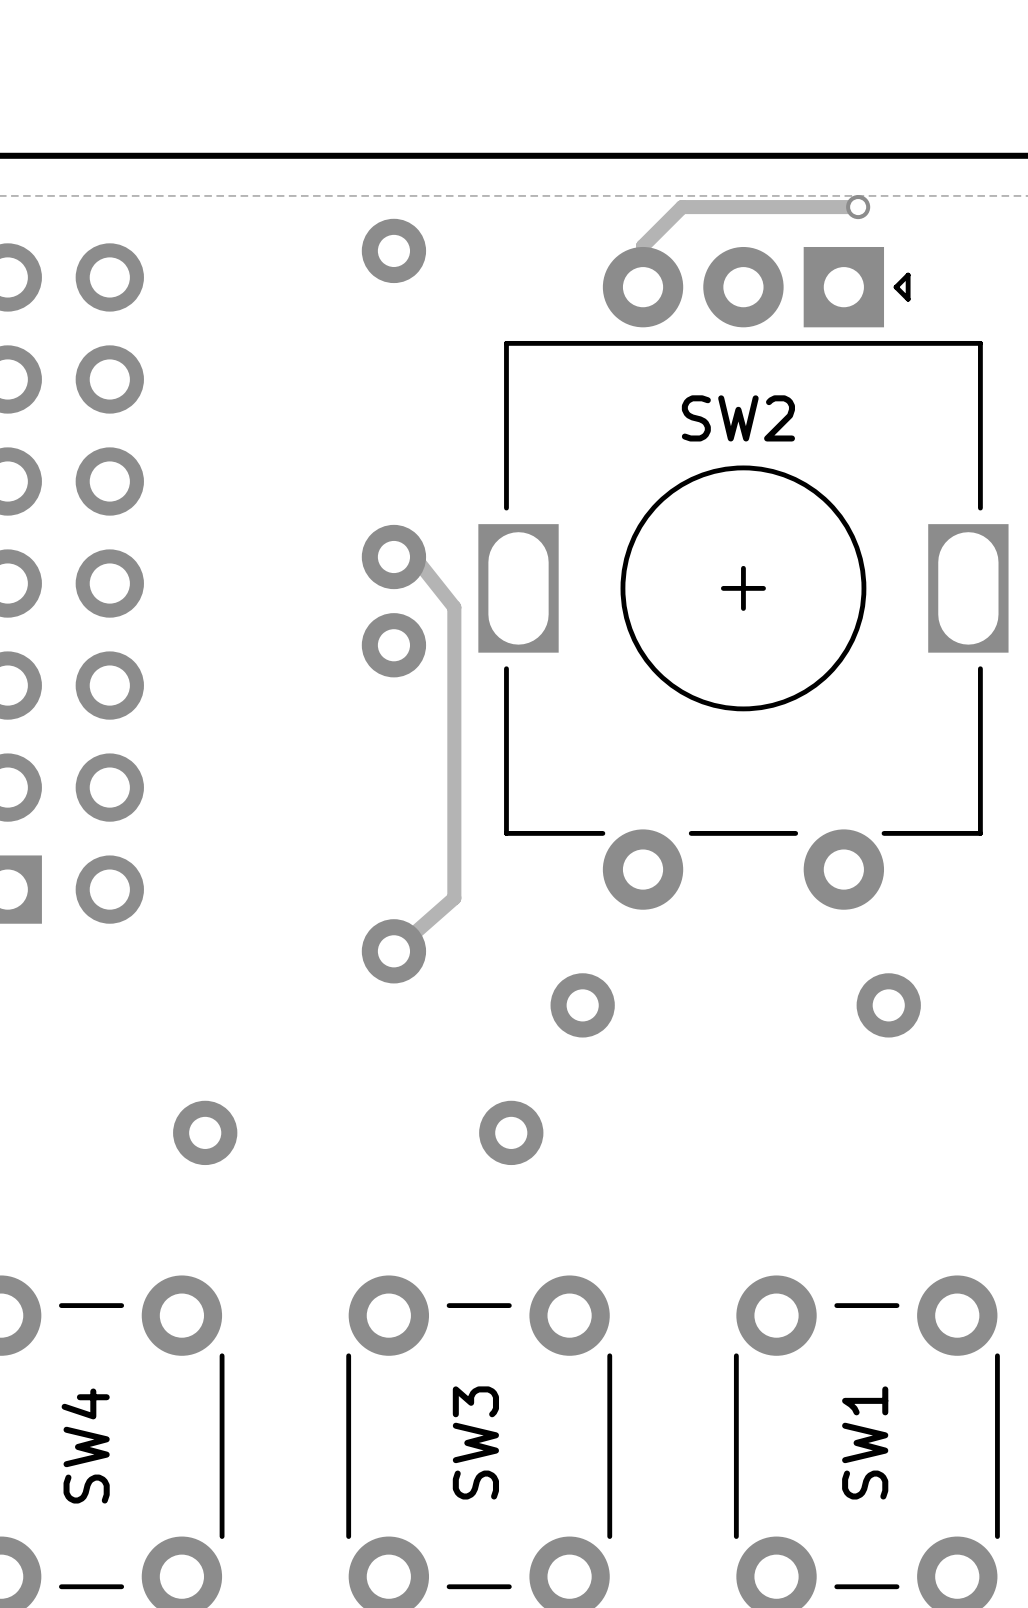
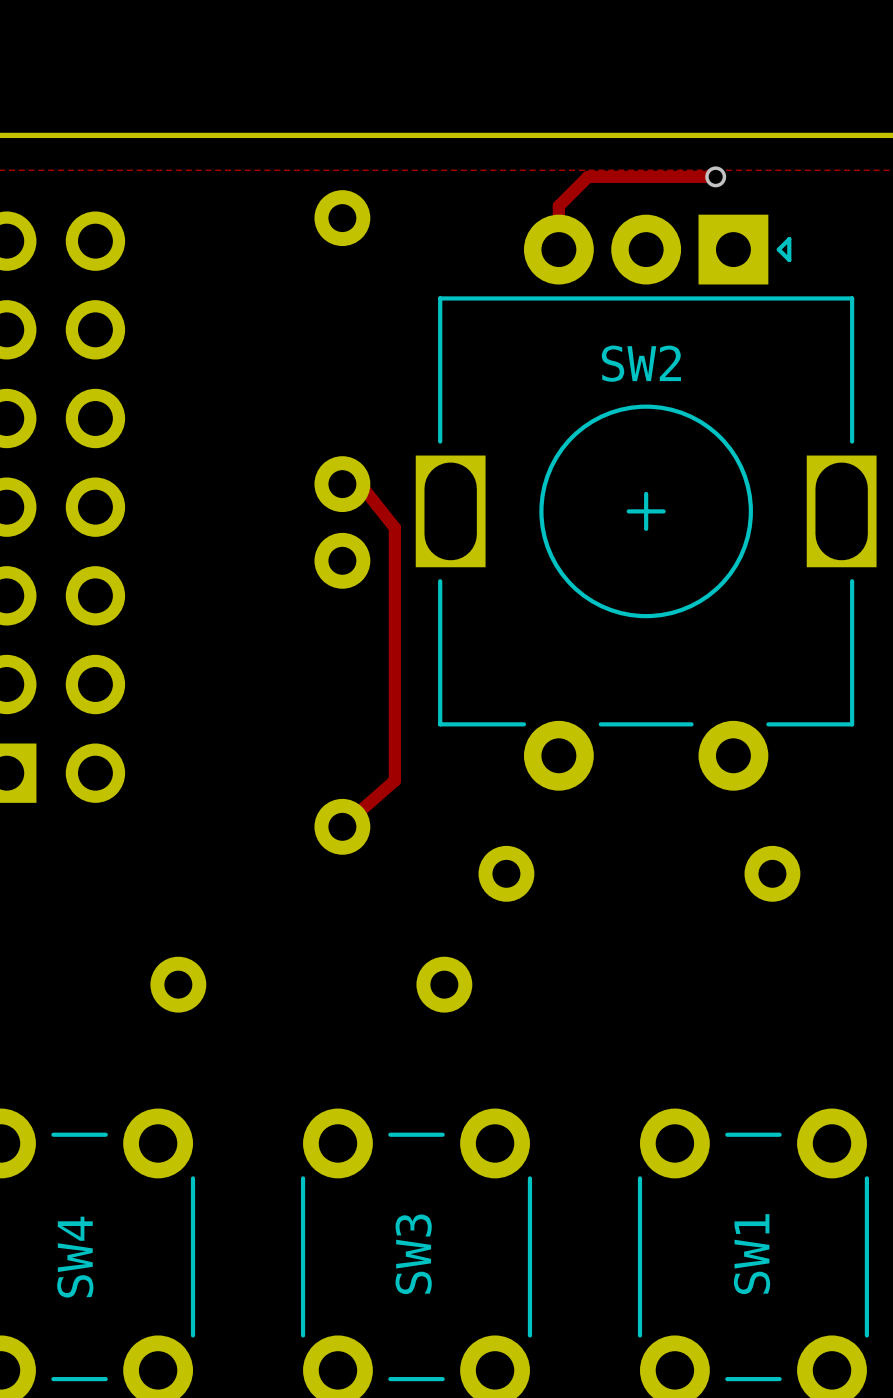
track: (858, 207) (682, 207) (643, 246) -> (715, 176) (588, 176) (558, 205) (558, 213)
via position: (858, 207) -> (715, 176)

